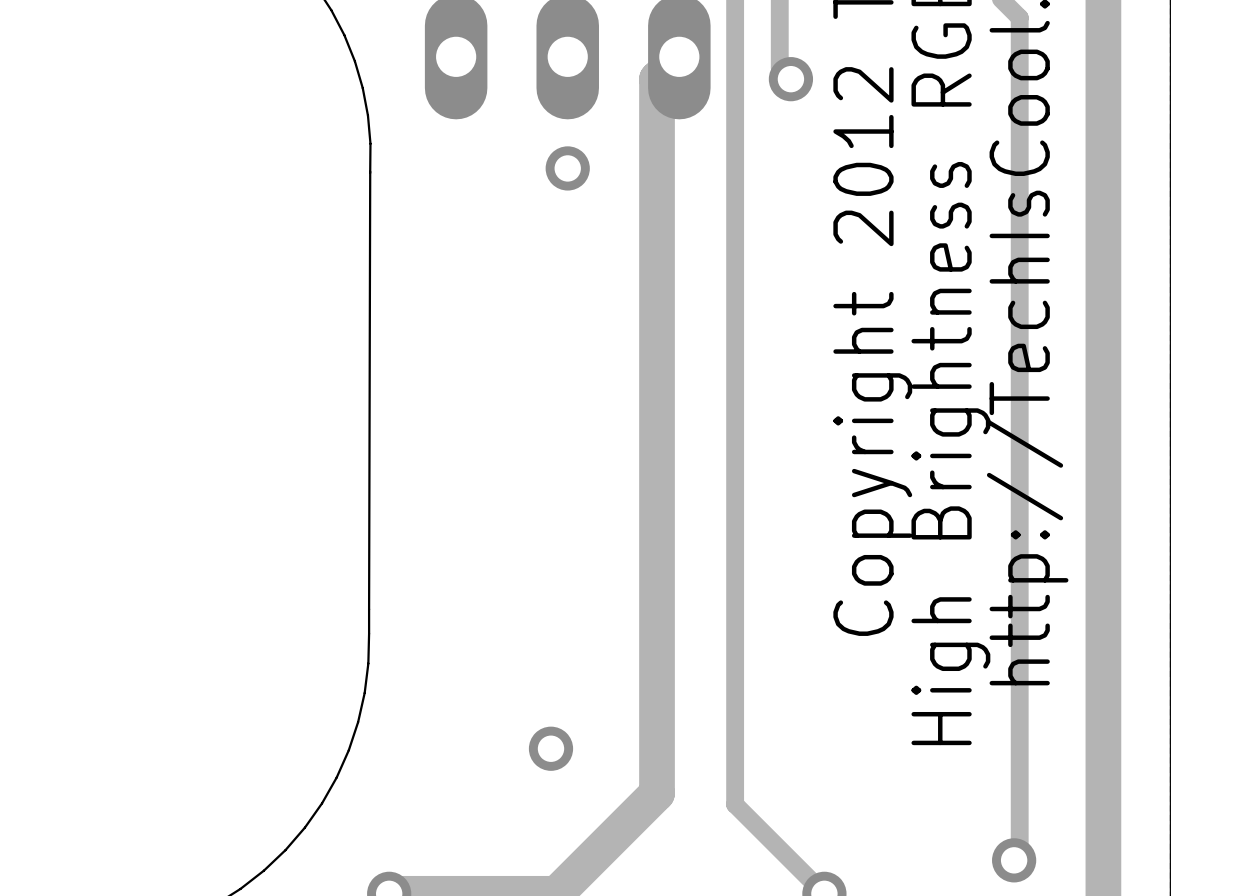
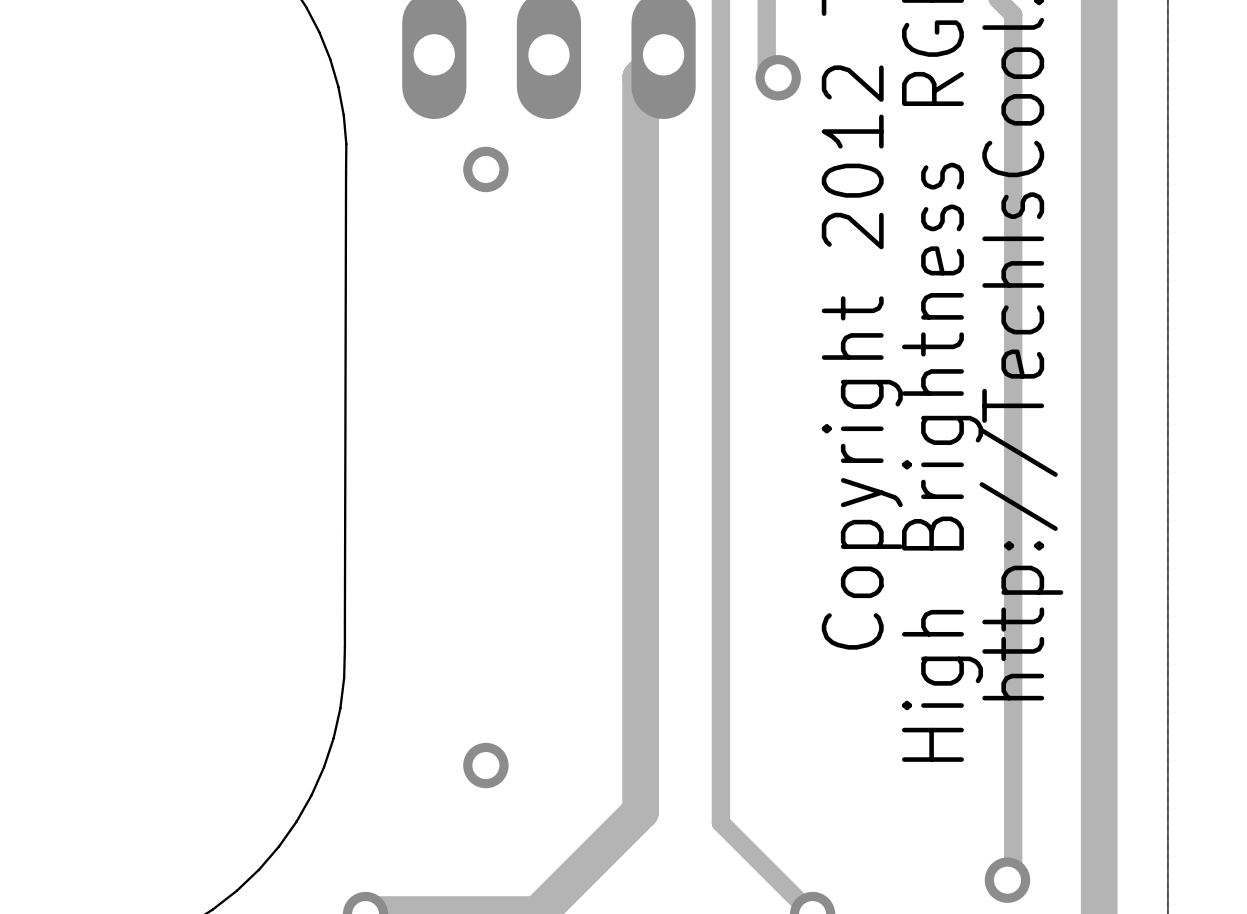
via position: (567, 168) -> (485, 169)
via position: (550, 748) -> (485, 765)

